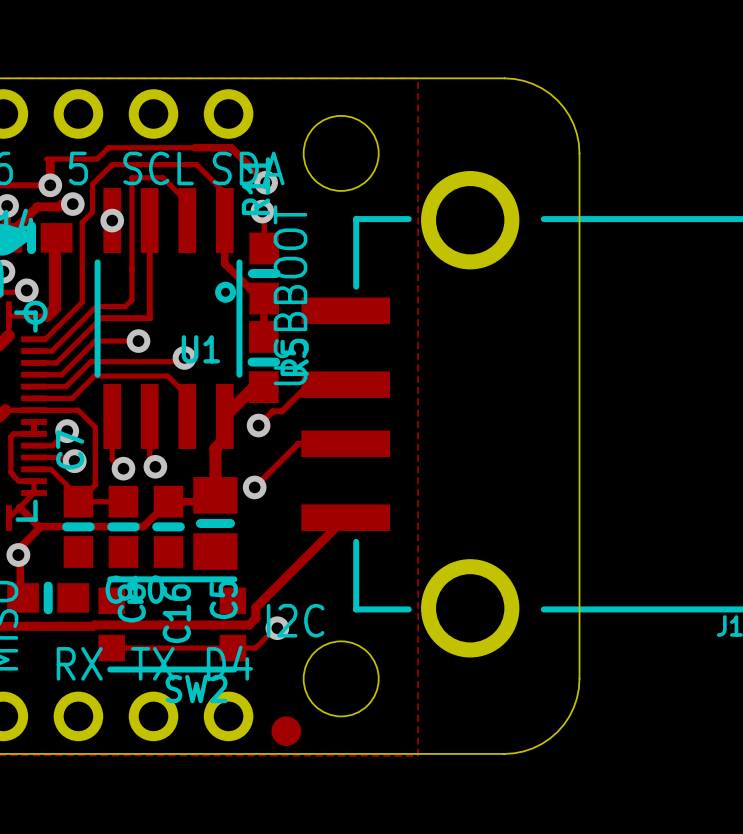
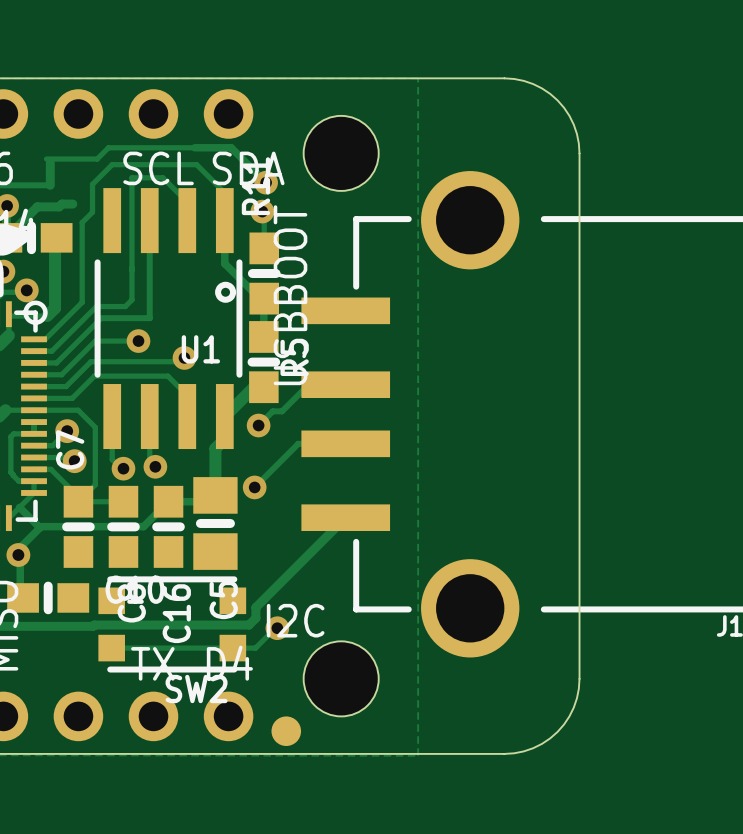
text: 5 (78, 168) -> none
via: (50, 185) -> none
via: (72, 204) -> none
via: (112, 220) -> none
text: RX (79, 663) -> none

